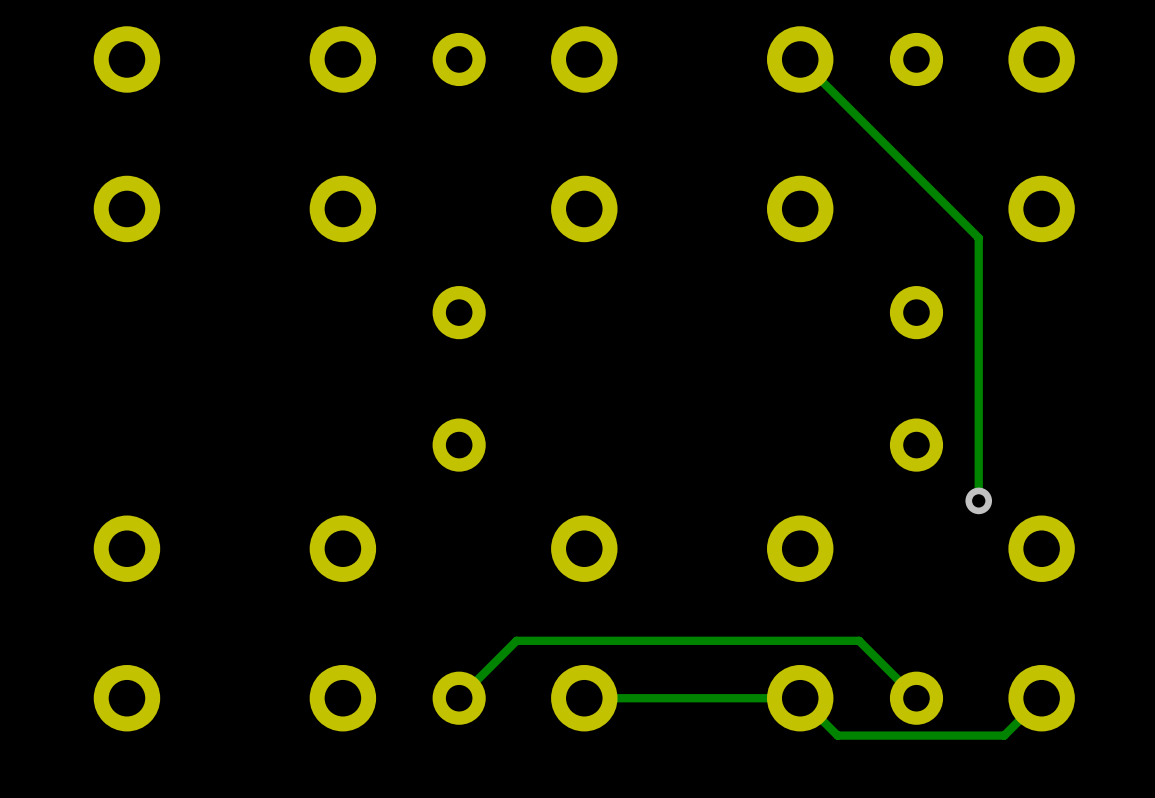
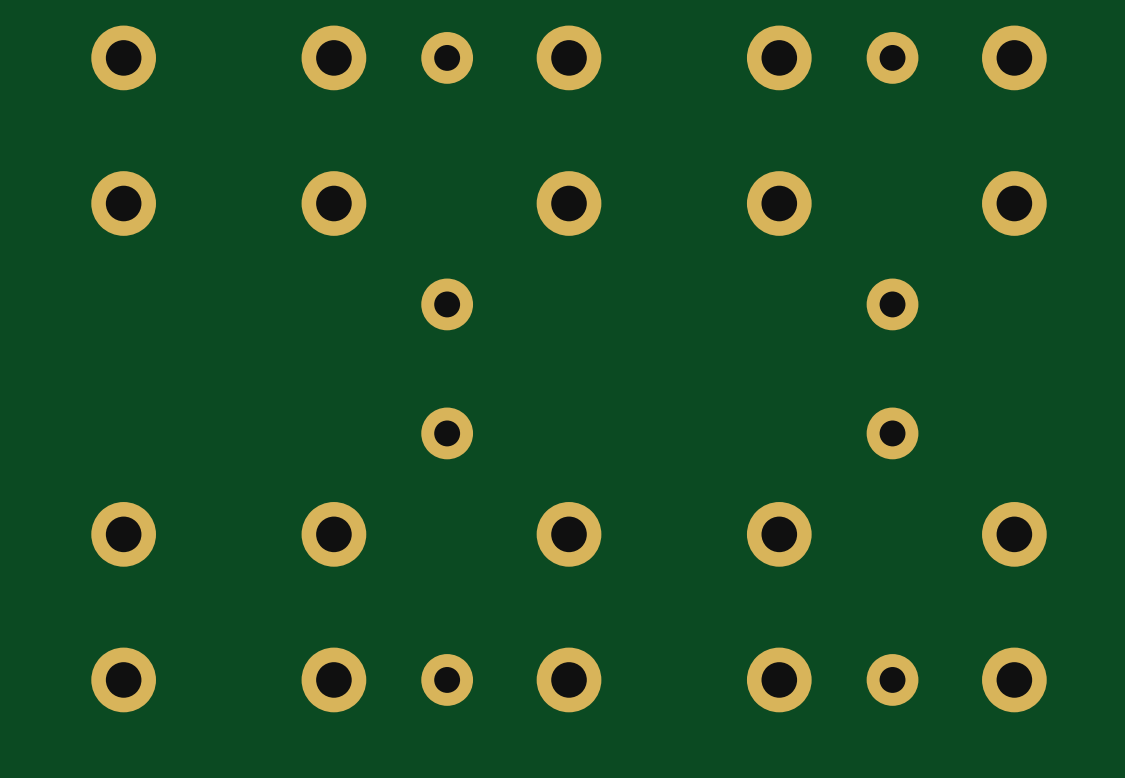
track: (800, 59) (978, 237) (978, 500) -> none
via: (978, 500) -> none
track: (916, 698) (859, 640) (516, 640) (459, 698) -> none
track: (1041, 698) (1004, 735) (837, 735) (800, 698) (584, 698) -> none

